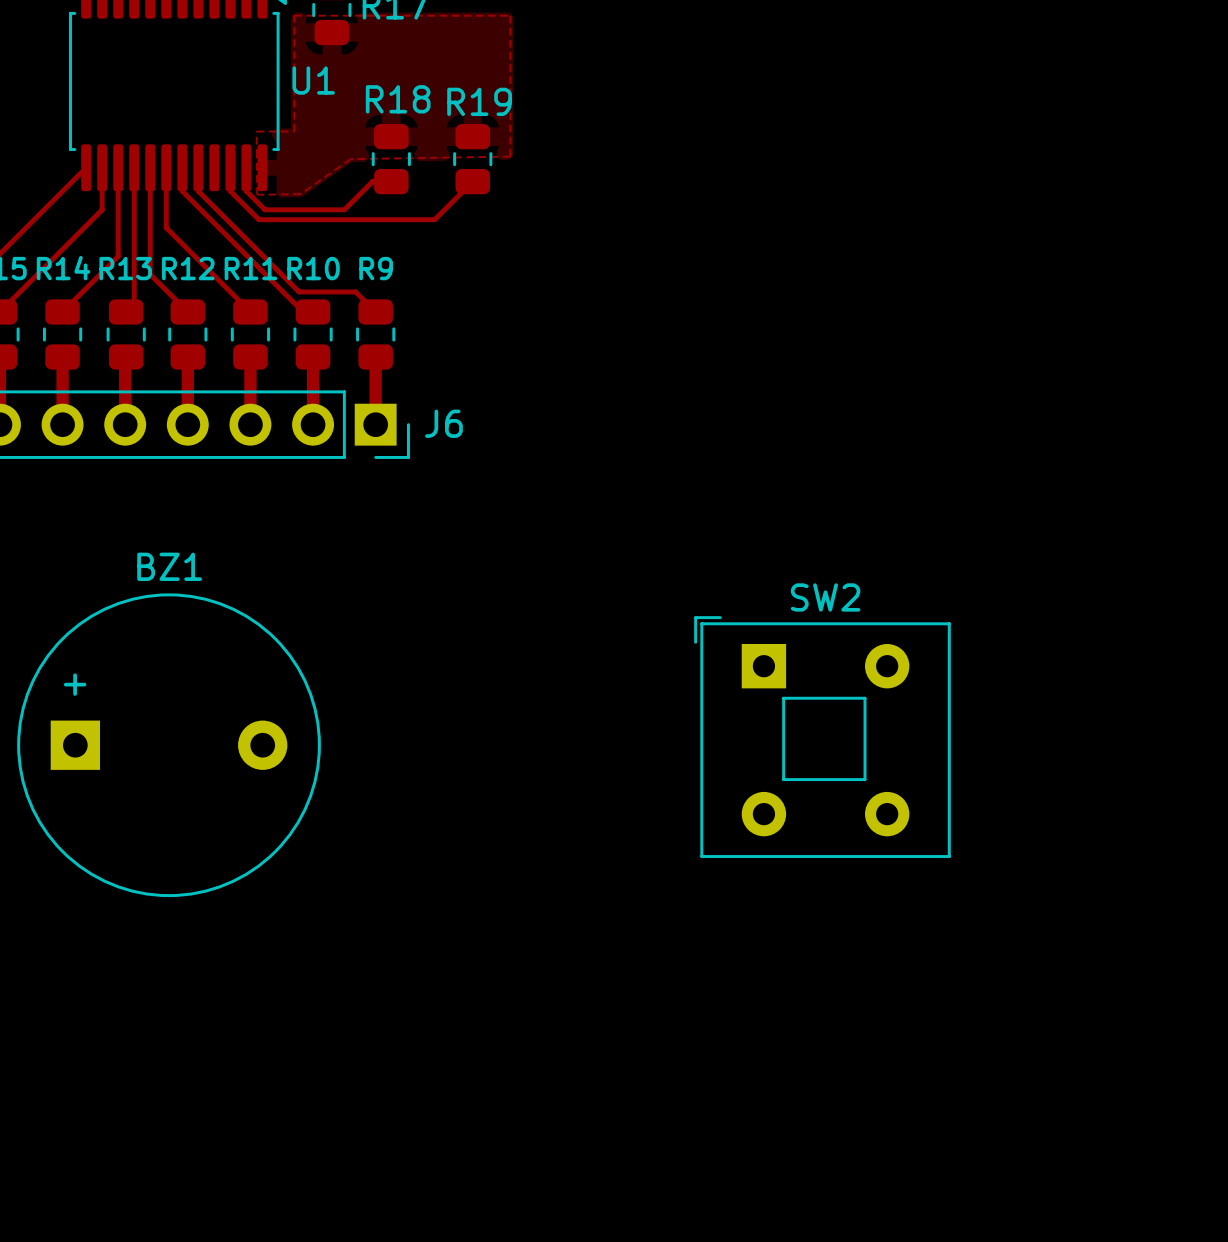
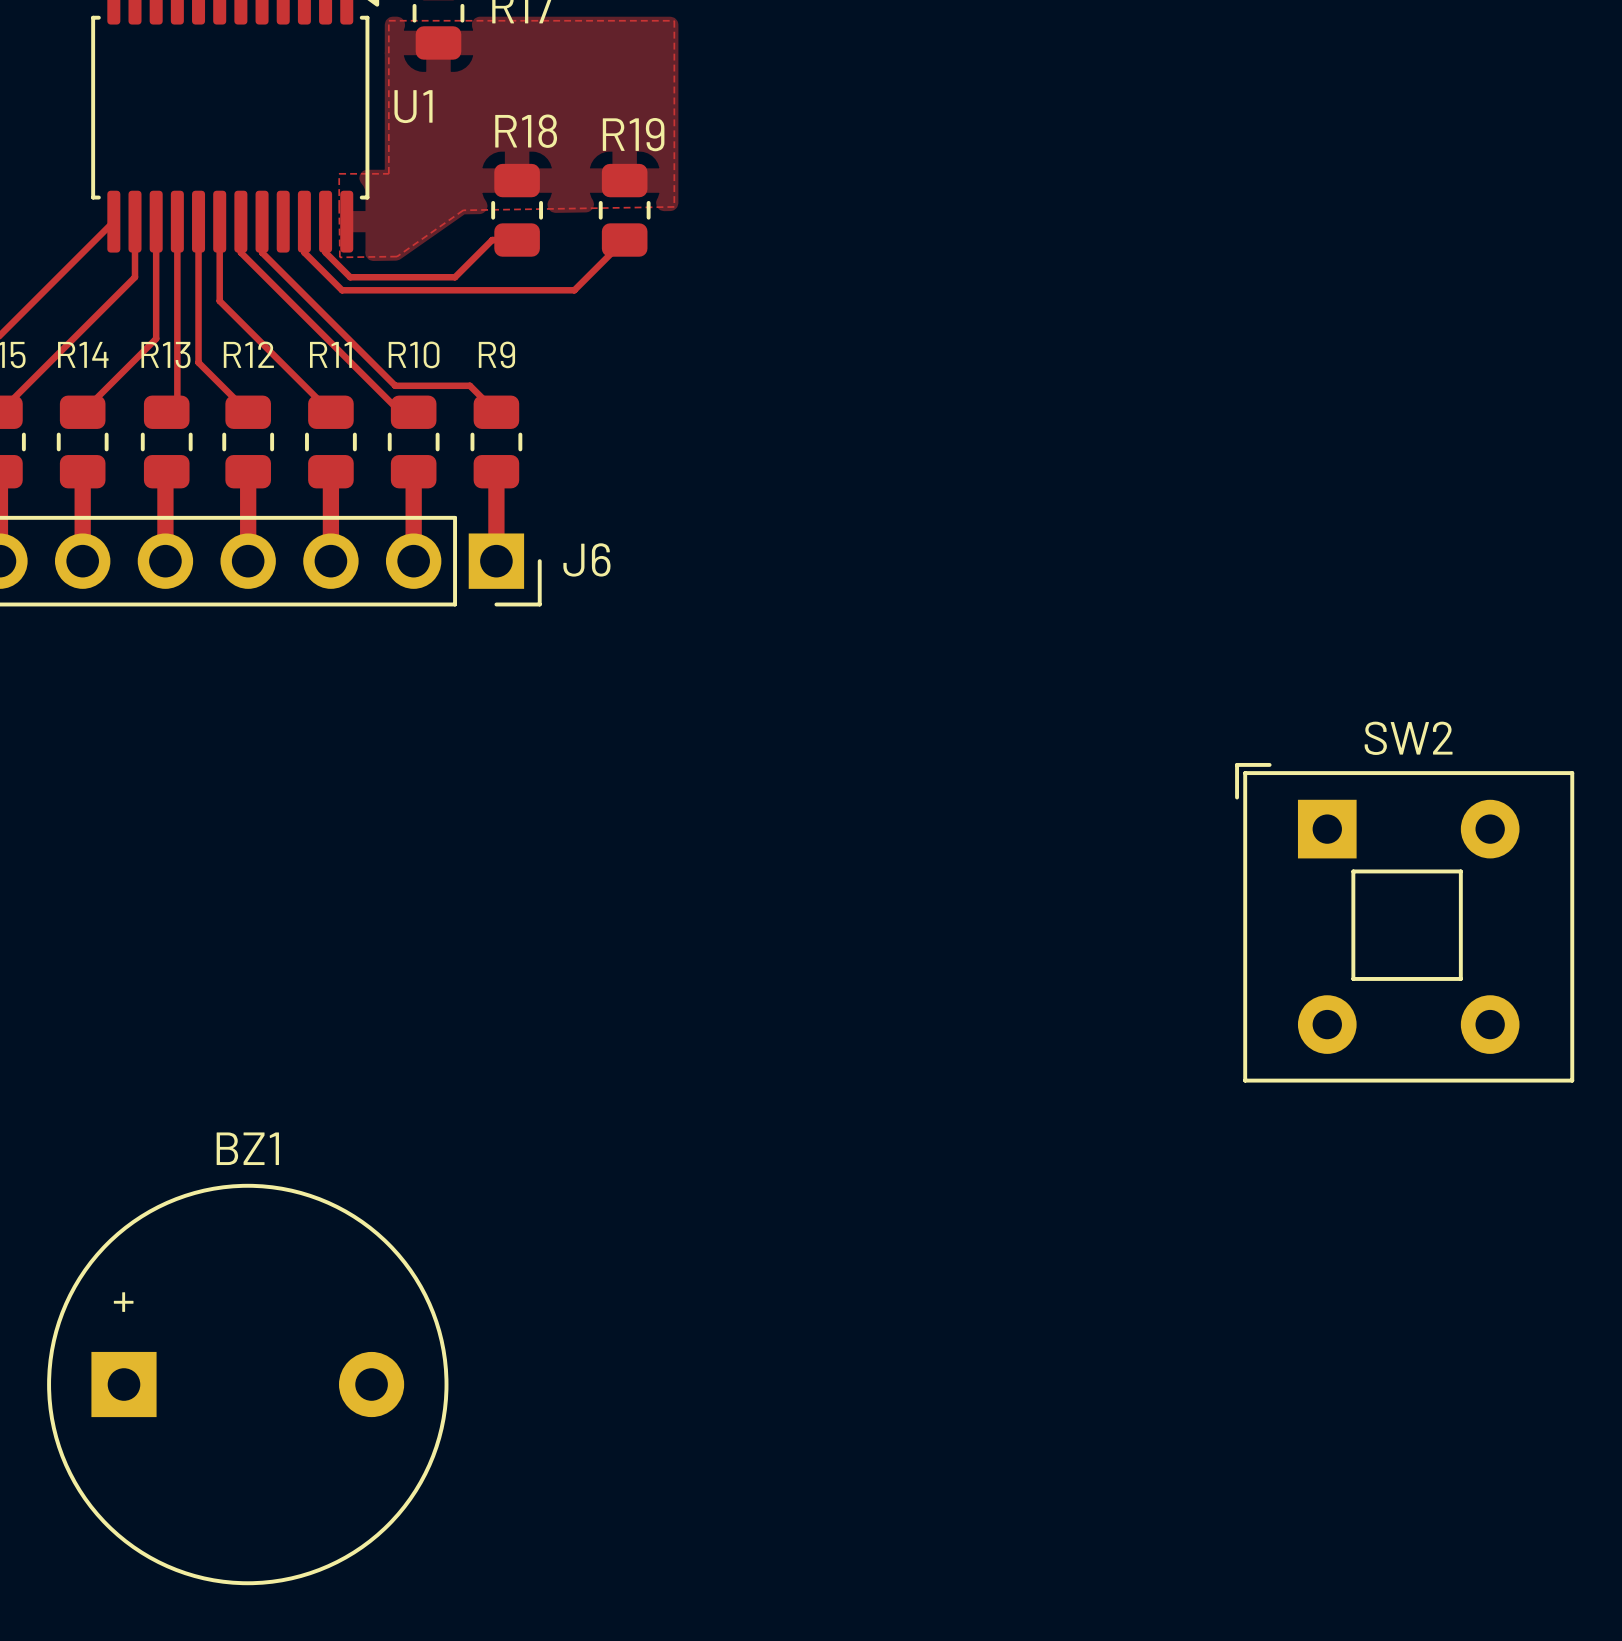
SW2 position: (822, 737) -> (1404, 922)
BZ1 position: (169, 745) -> (247, 1384)

